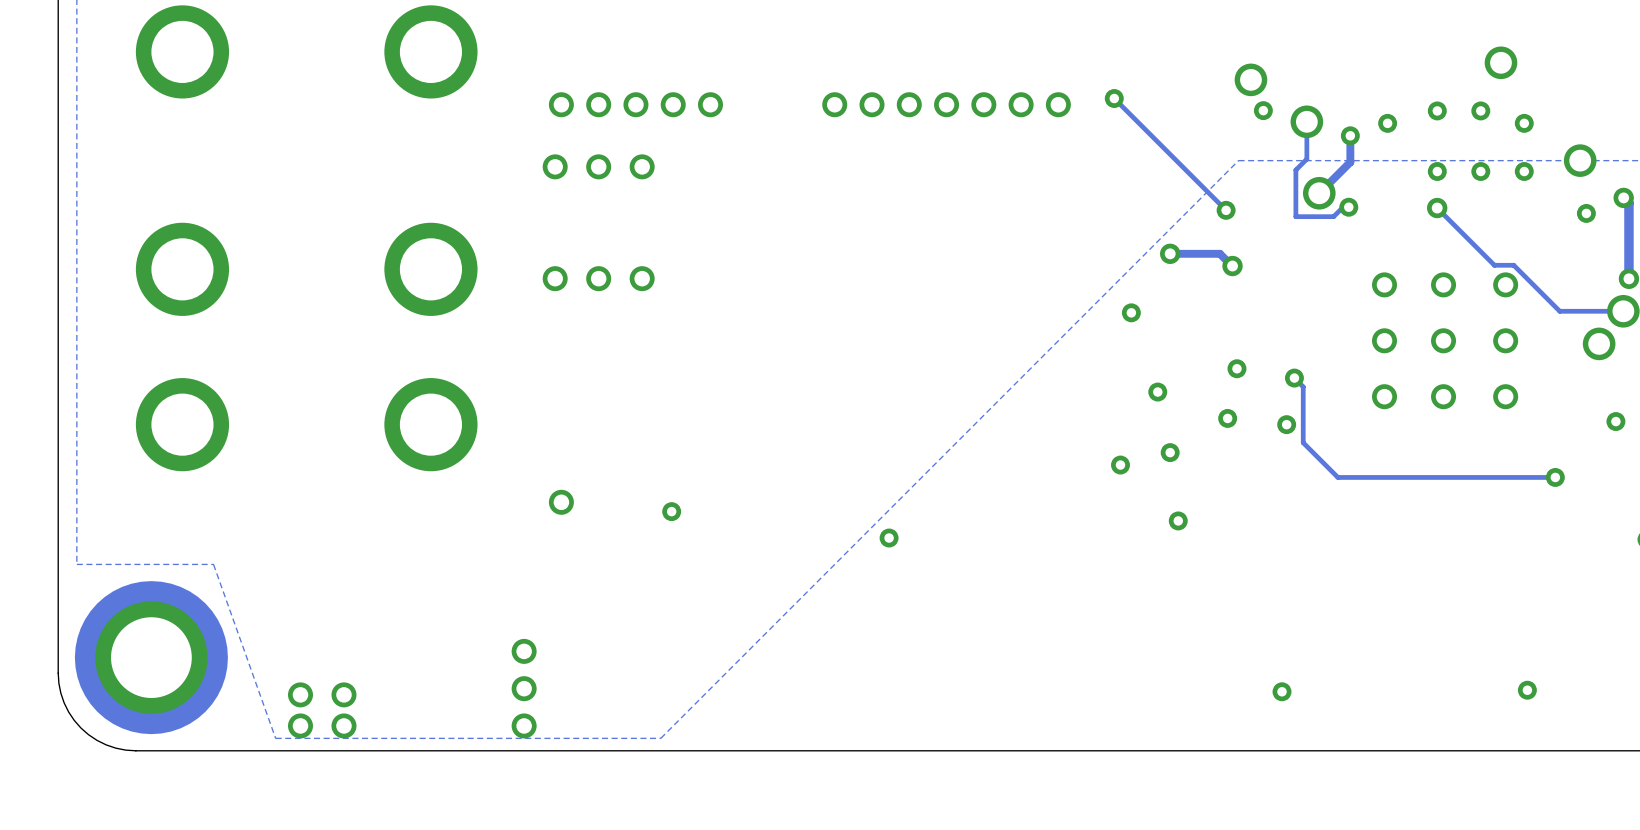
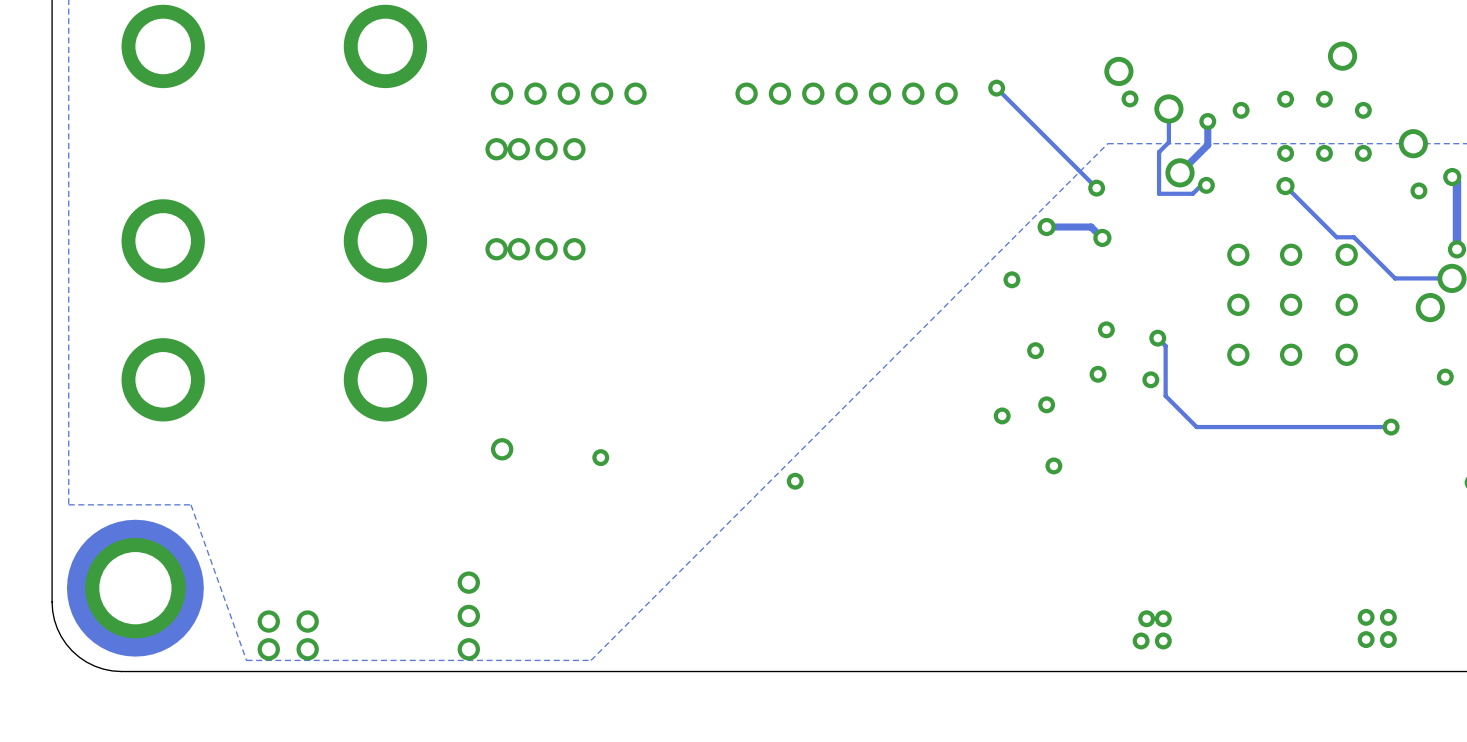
via: none -> (518, 149)
via: (598, 166) -> none
via: none -> (546, 149)
via: none -> (518, 249)
via: (598, 278) -> none
via: none -> (546, 249)
via: none -> (1388, 617)
via: none -> (1163, 618)
via: none -> (1366, 639)
via: none -> (1388, 639)
via: none -> (1141, 640)
via: none -> (1163, 640)

